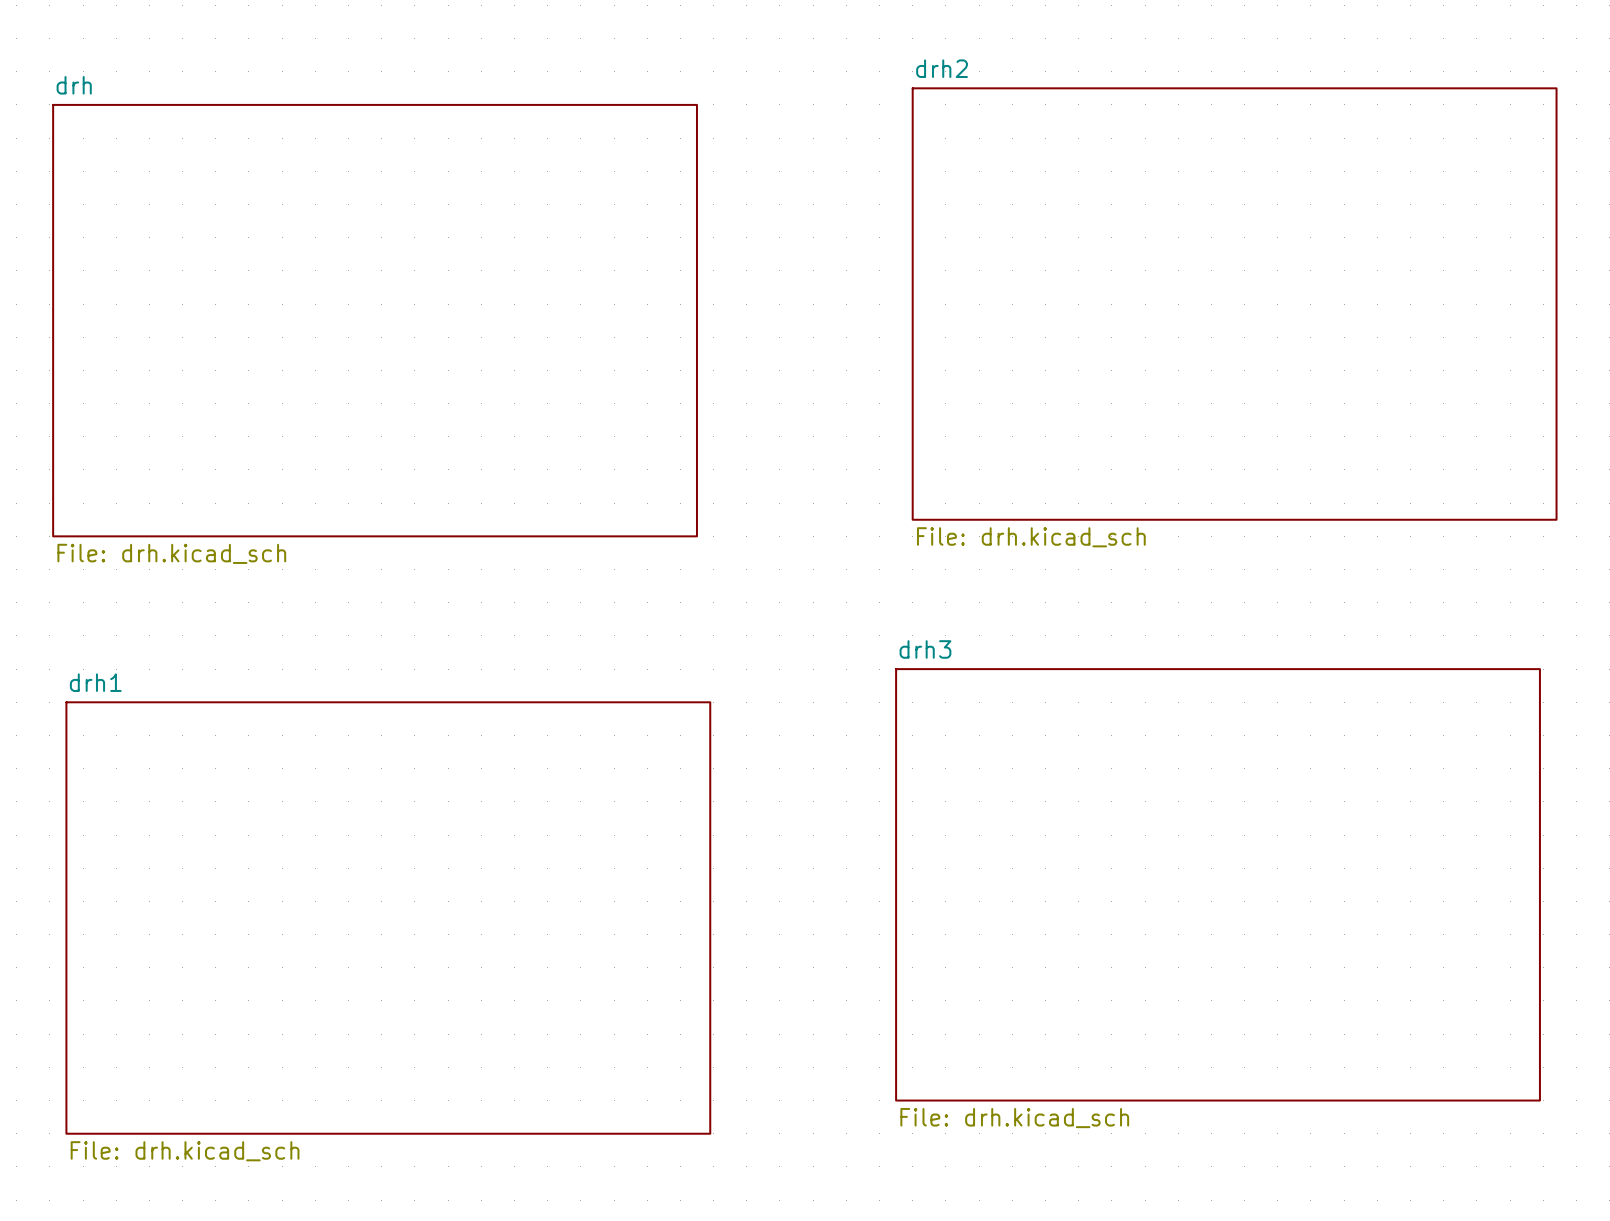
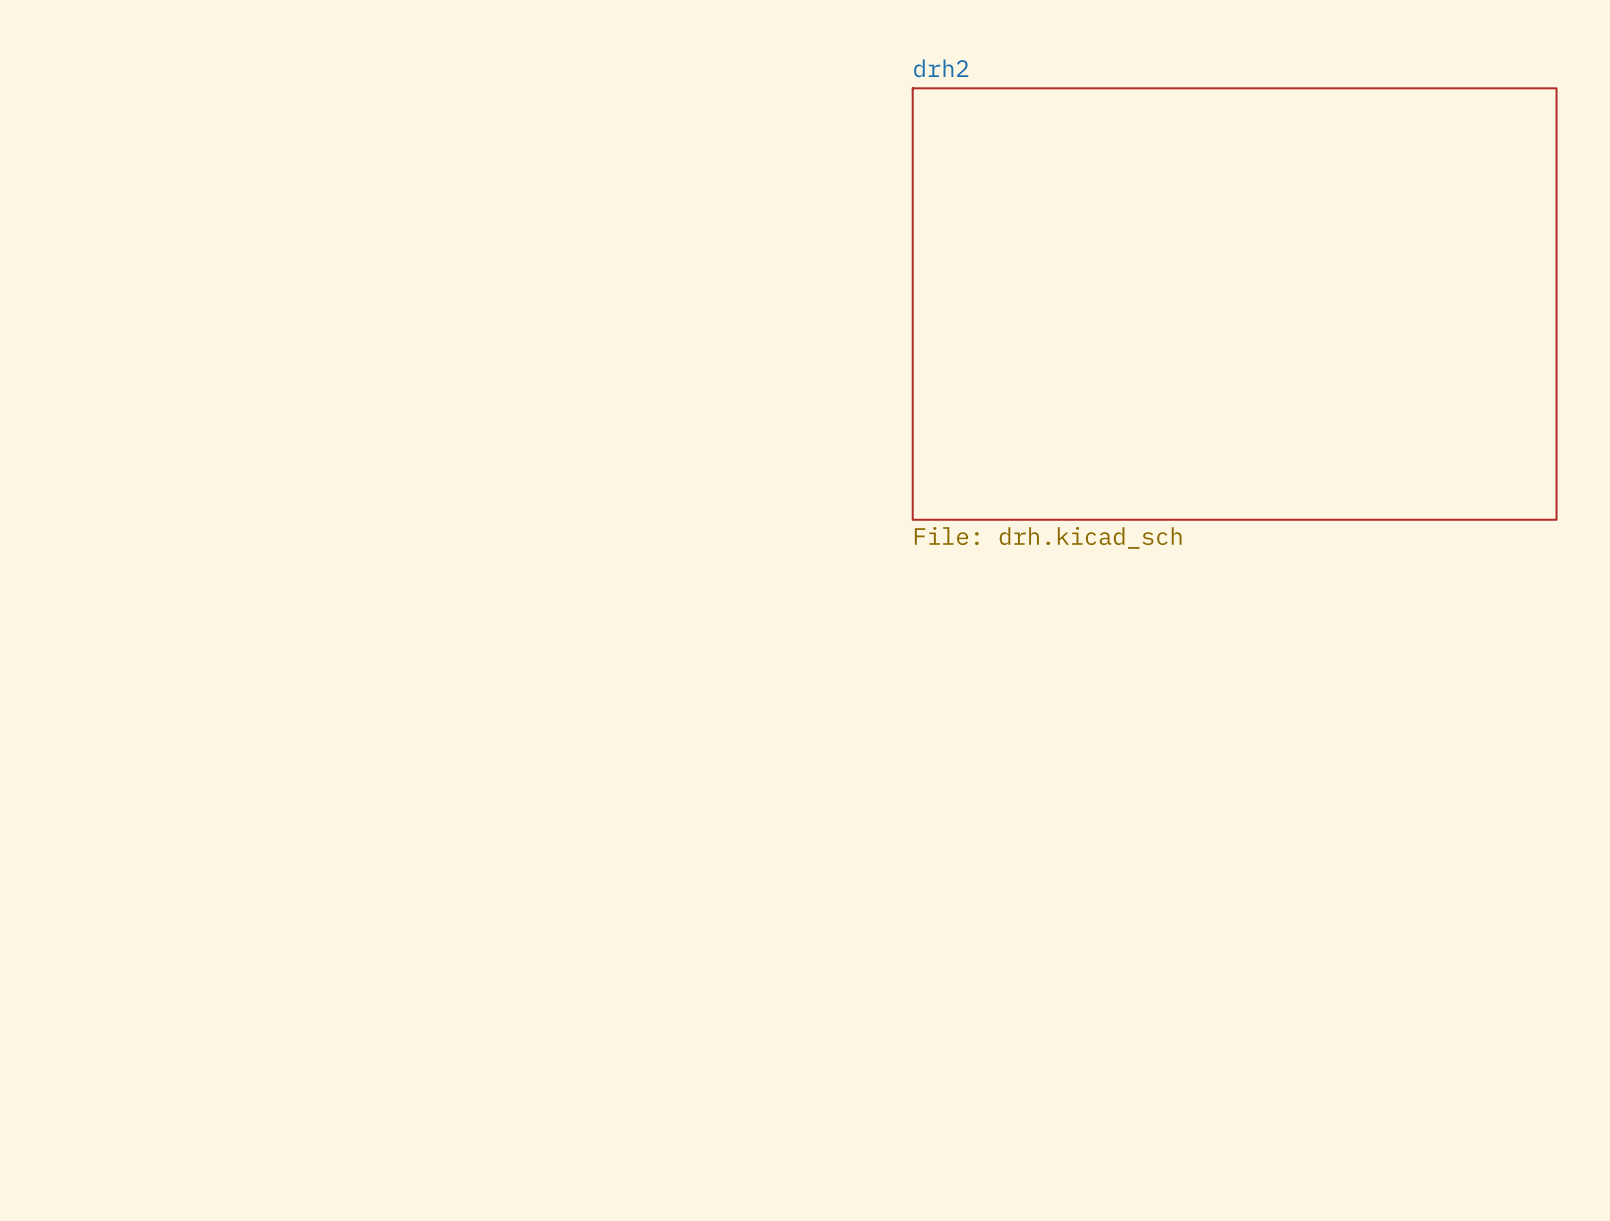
sheet drh: File: drh.kicad_sch (375, 320) -> none
sheet drh3: File: drh.kicad_sch (1218, 884) -> none
sheet drh1: File: drh.kicad_sch (388, 918) -> none

